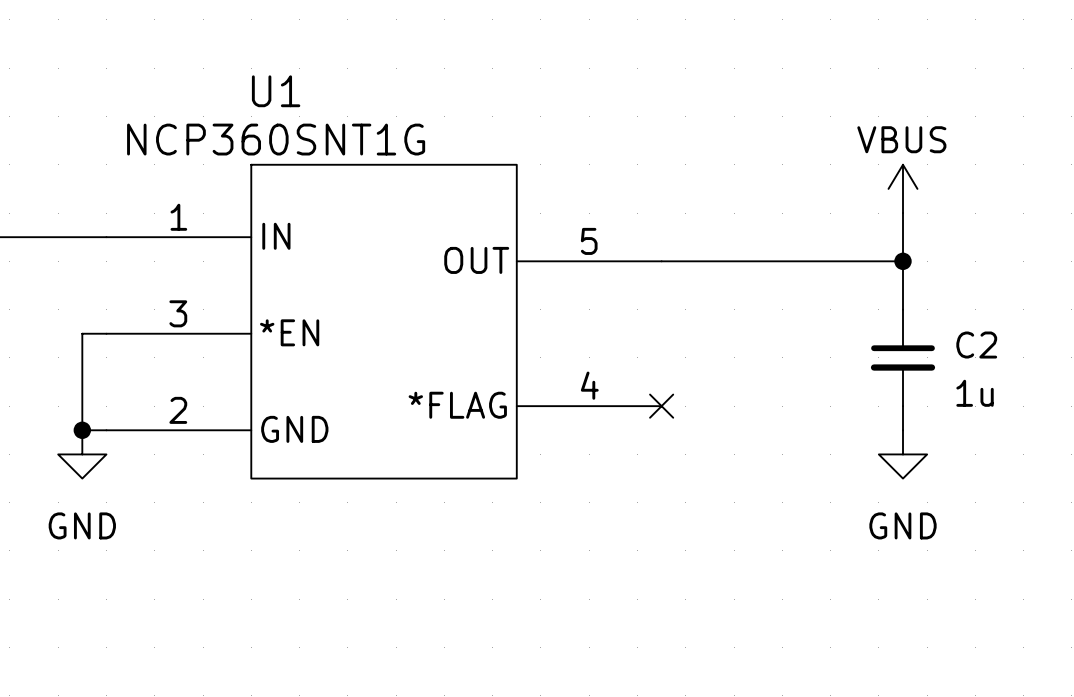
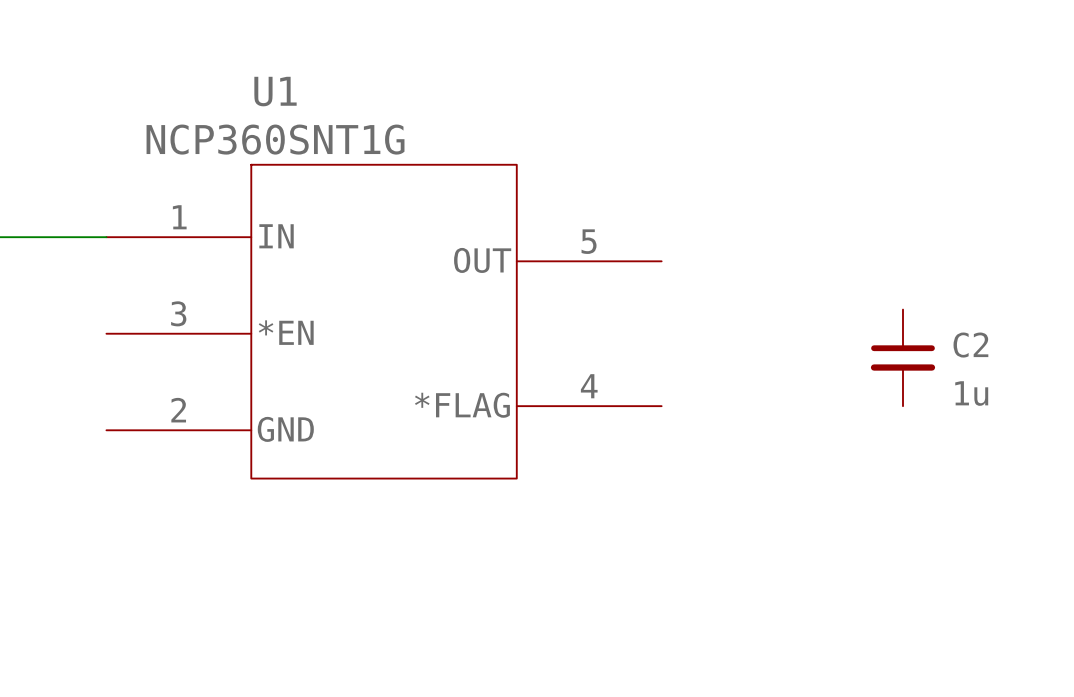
power symbol: VBUS (903, 188) -> none
wire: (903, 213) (903, 309) -> none
wire: (661, 261) (903, 261) -> none
junction: (903, 261) -> none
wire: (106, 333) (82, 333) (82, 430) (106, 430) -> none
no-connect mark: (661, 406) -> none
wire: (903, 406) (903, 430) -> none
junction: (82, 430) -> none
power symbol: GND (82, 454) -> none
power symbol: GND (903, 454) -> none

